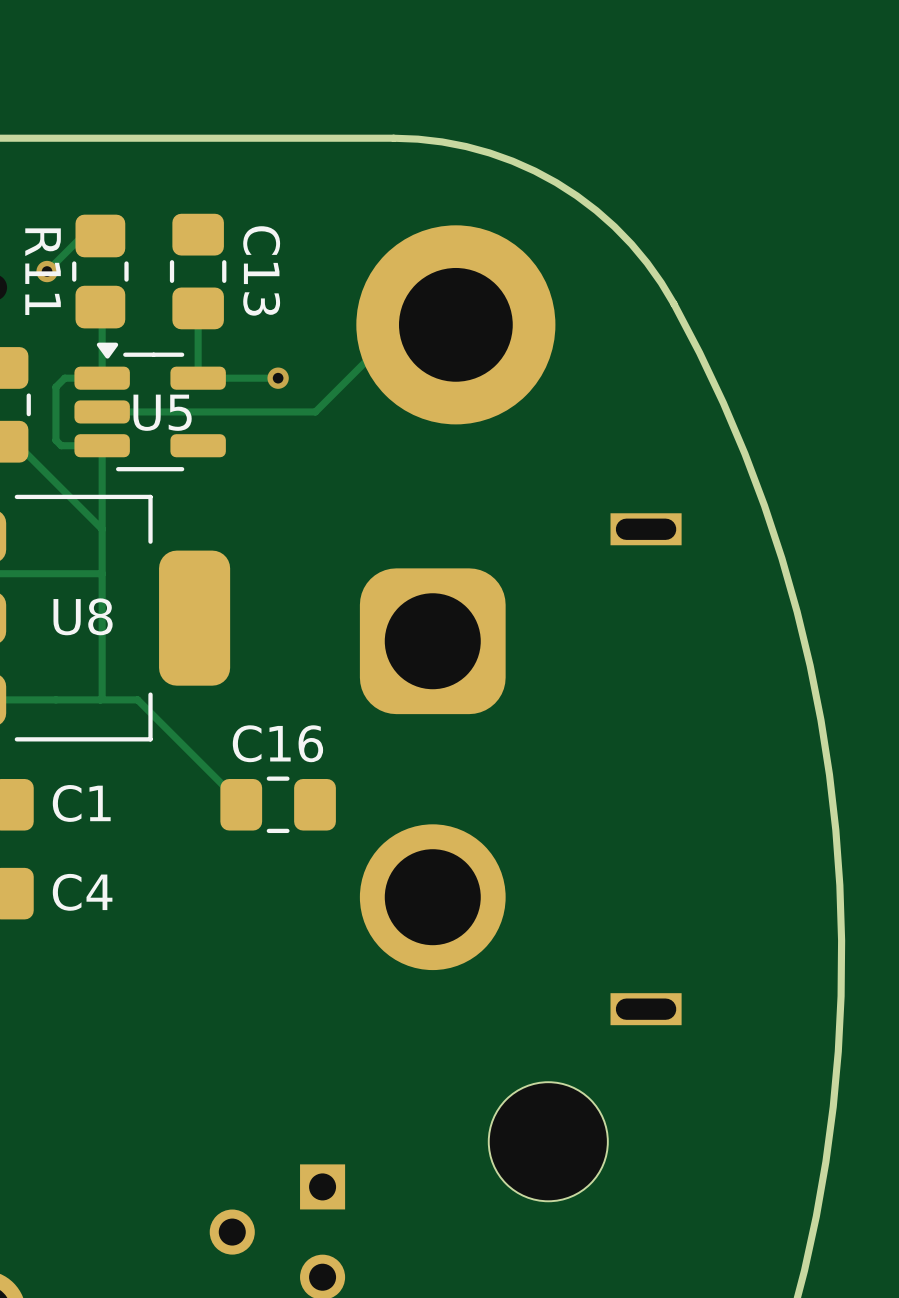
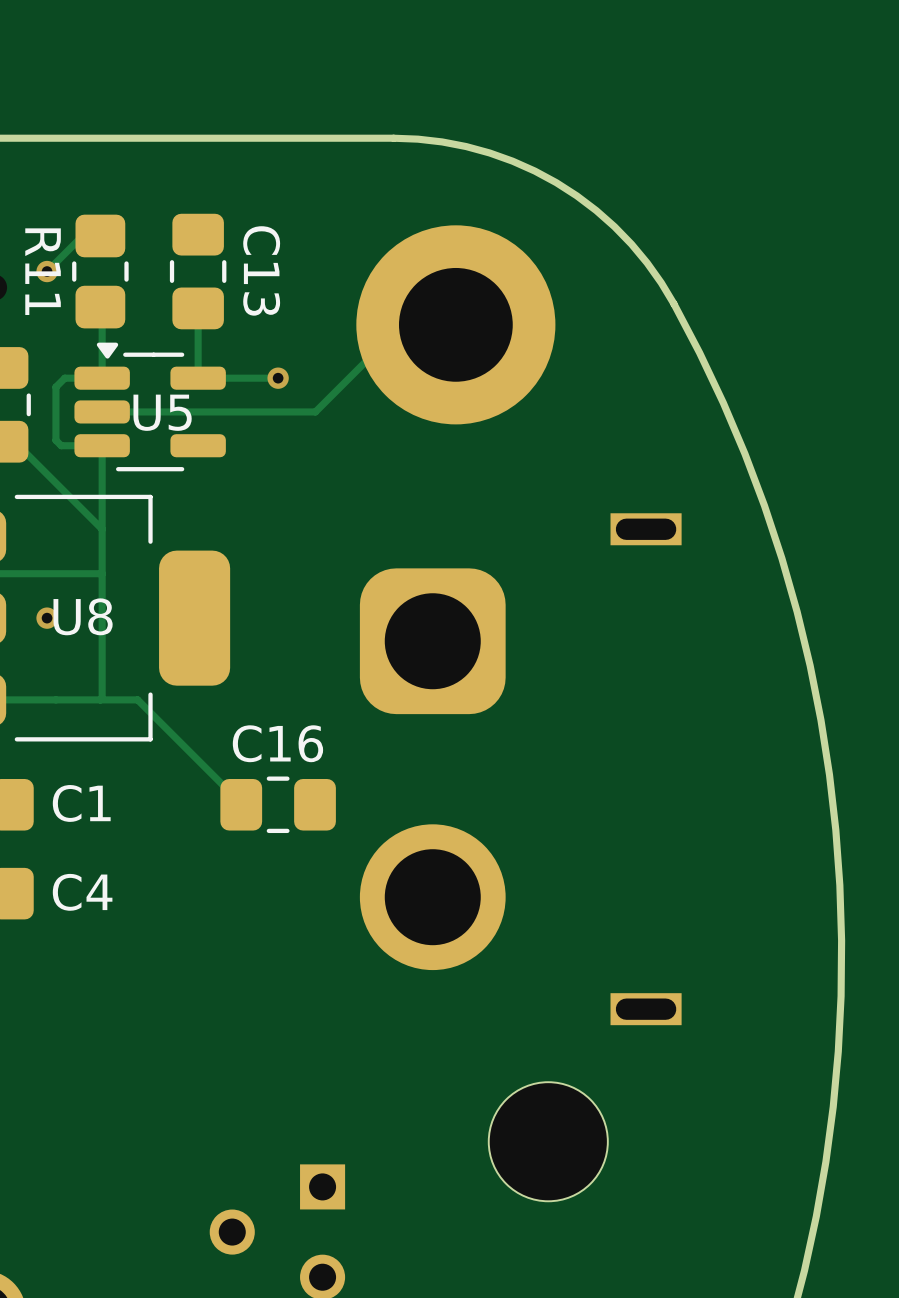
via: none -> (47, 618)

